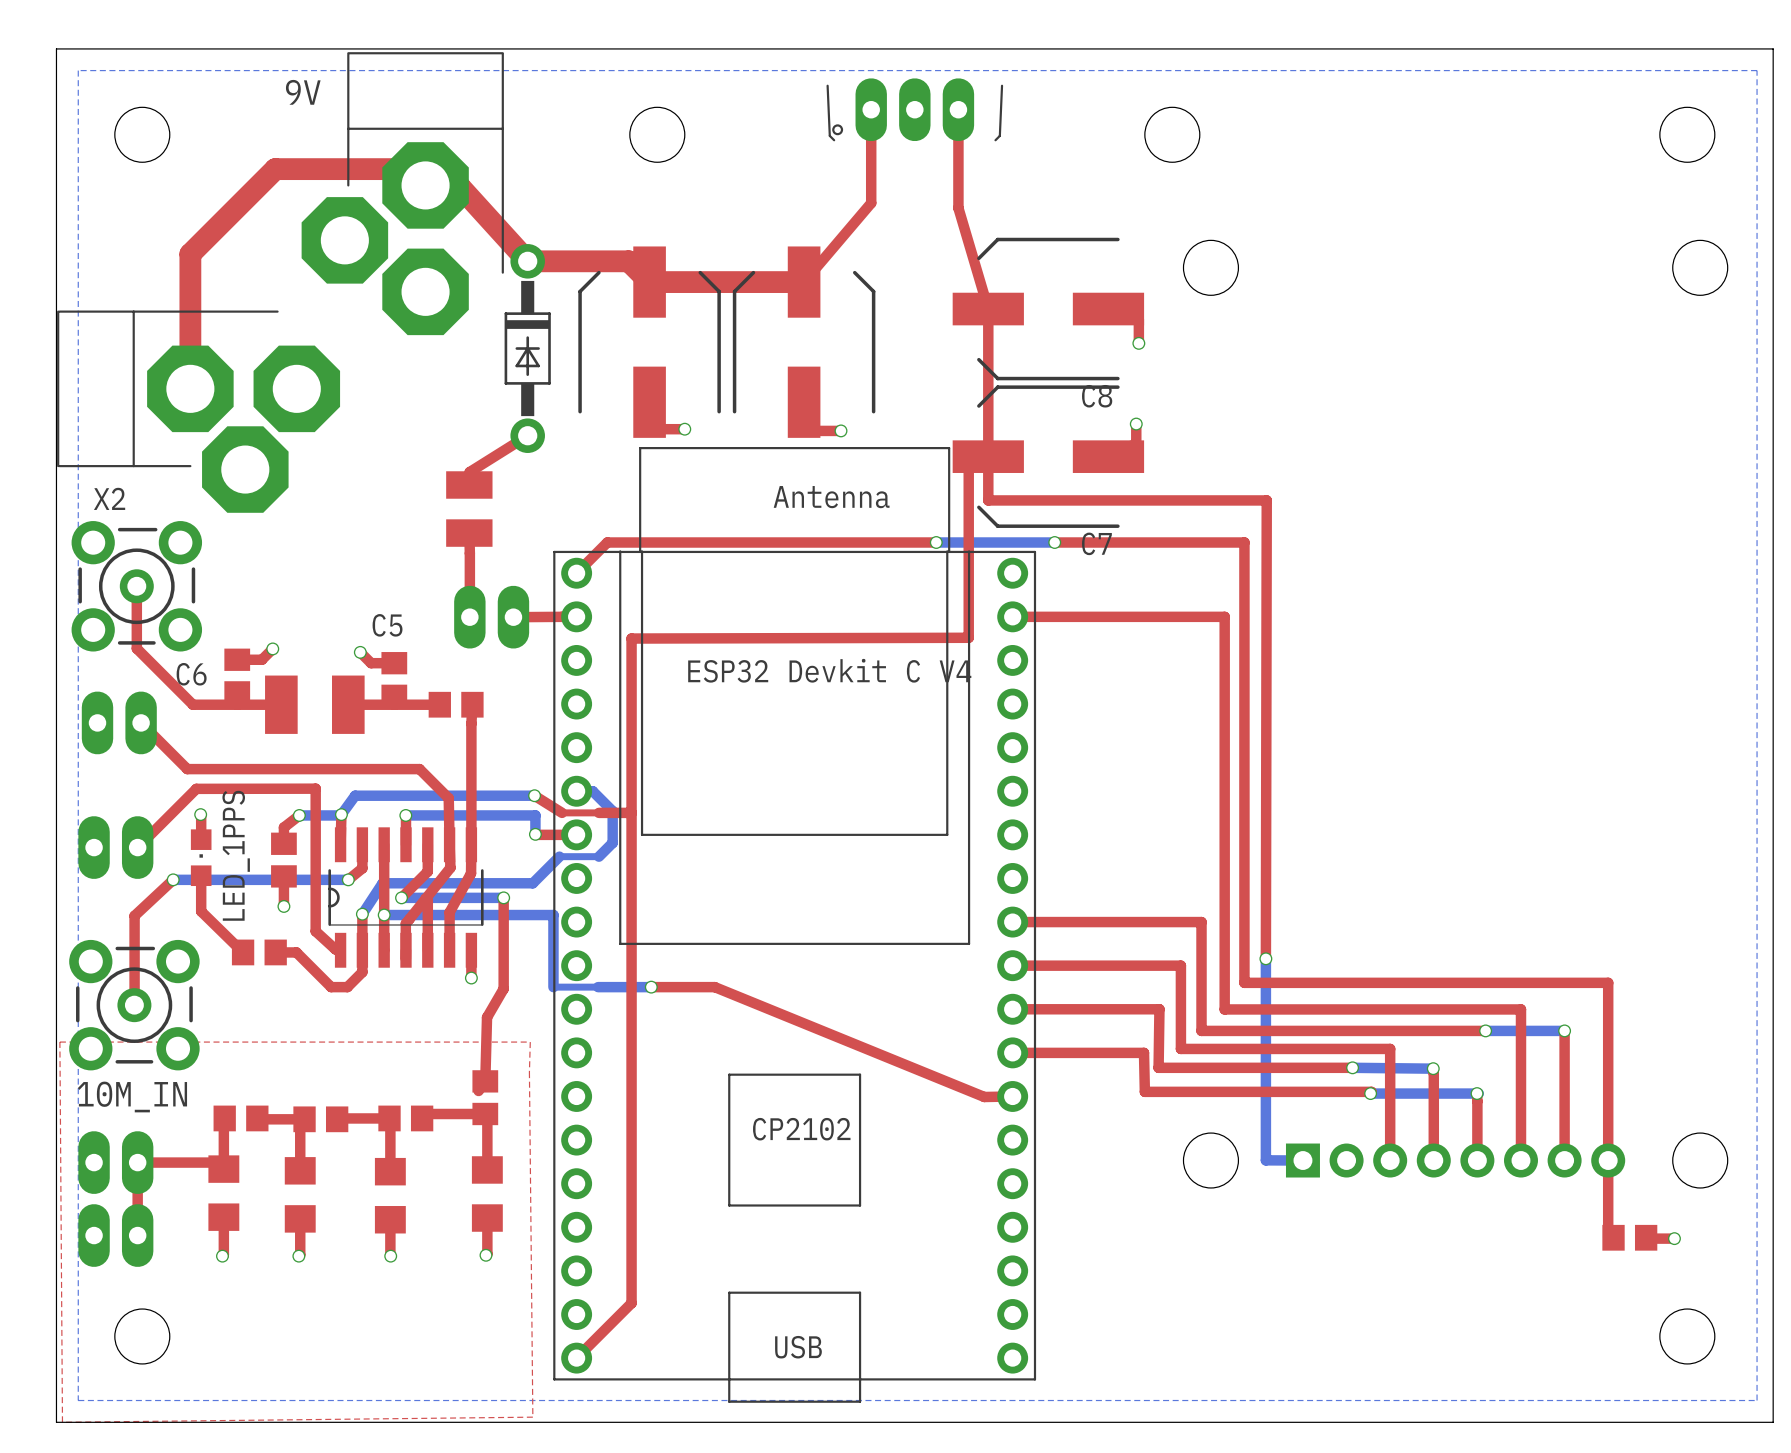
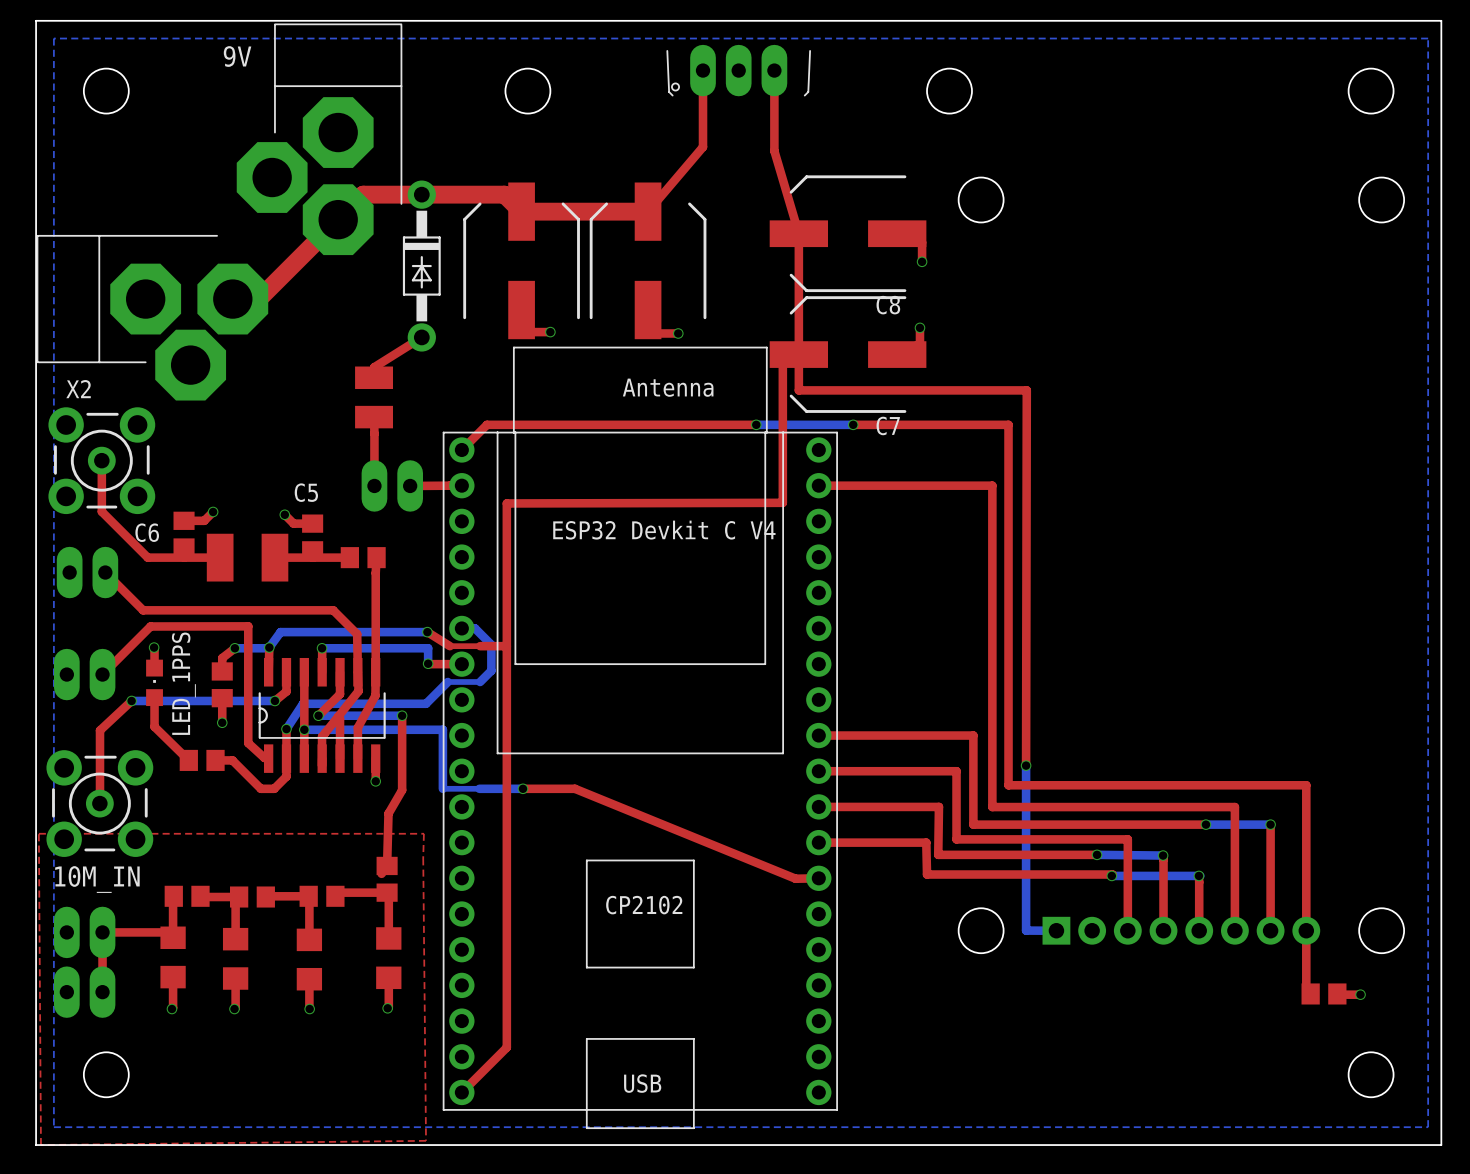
top track: (527, 261) (459, 186) (425, 185) (409, 169) (275, 169) (190, 254) (190, 388) -> (421, 194) (363, 194) (258, 299) (232, 299)

